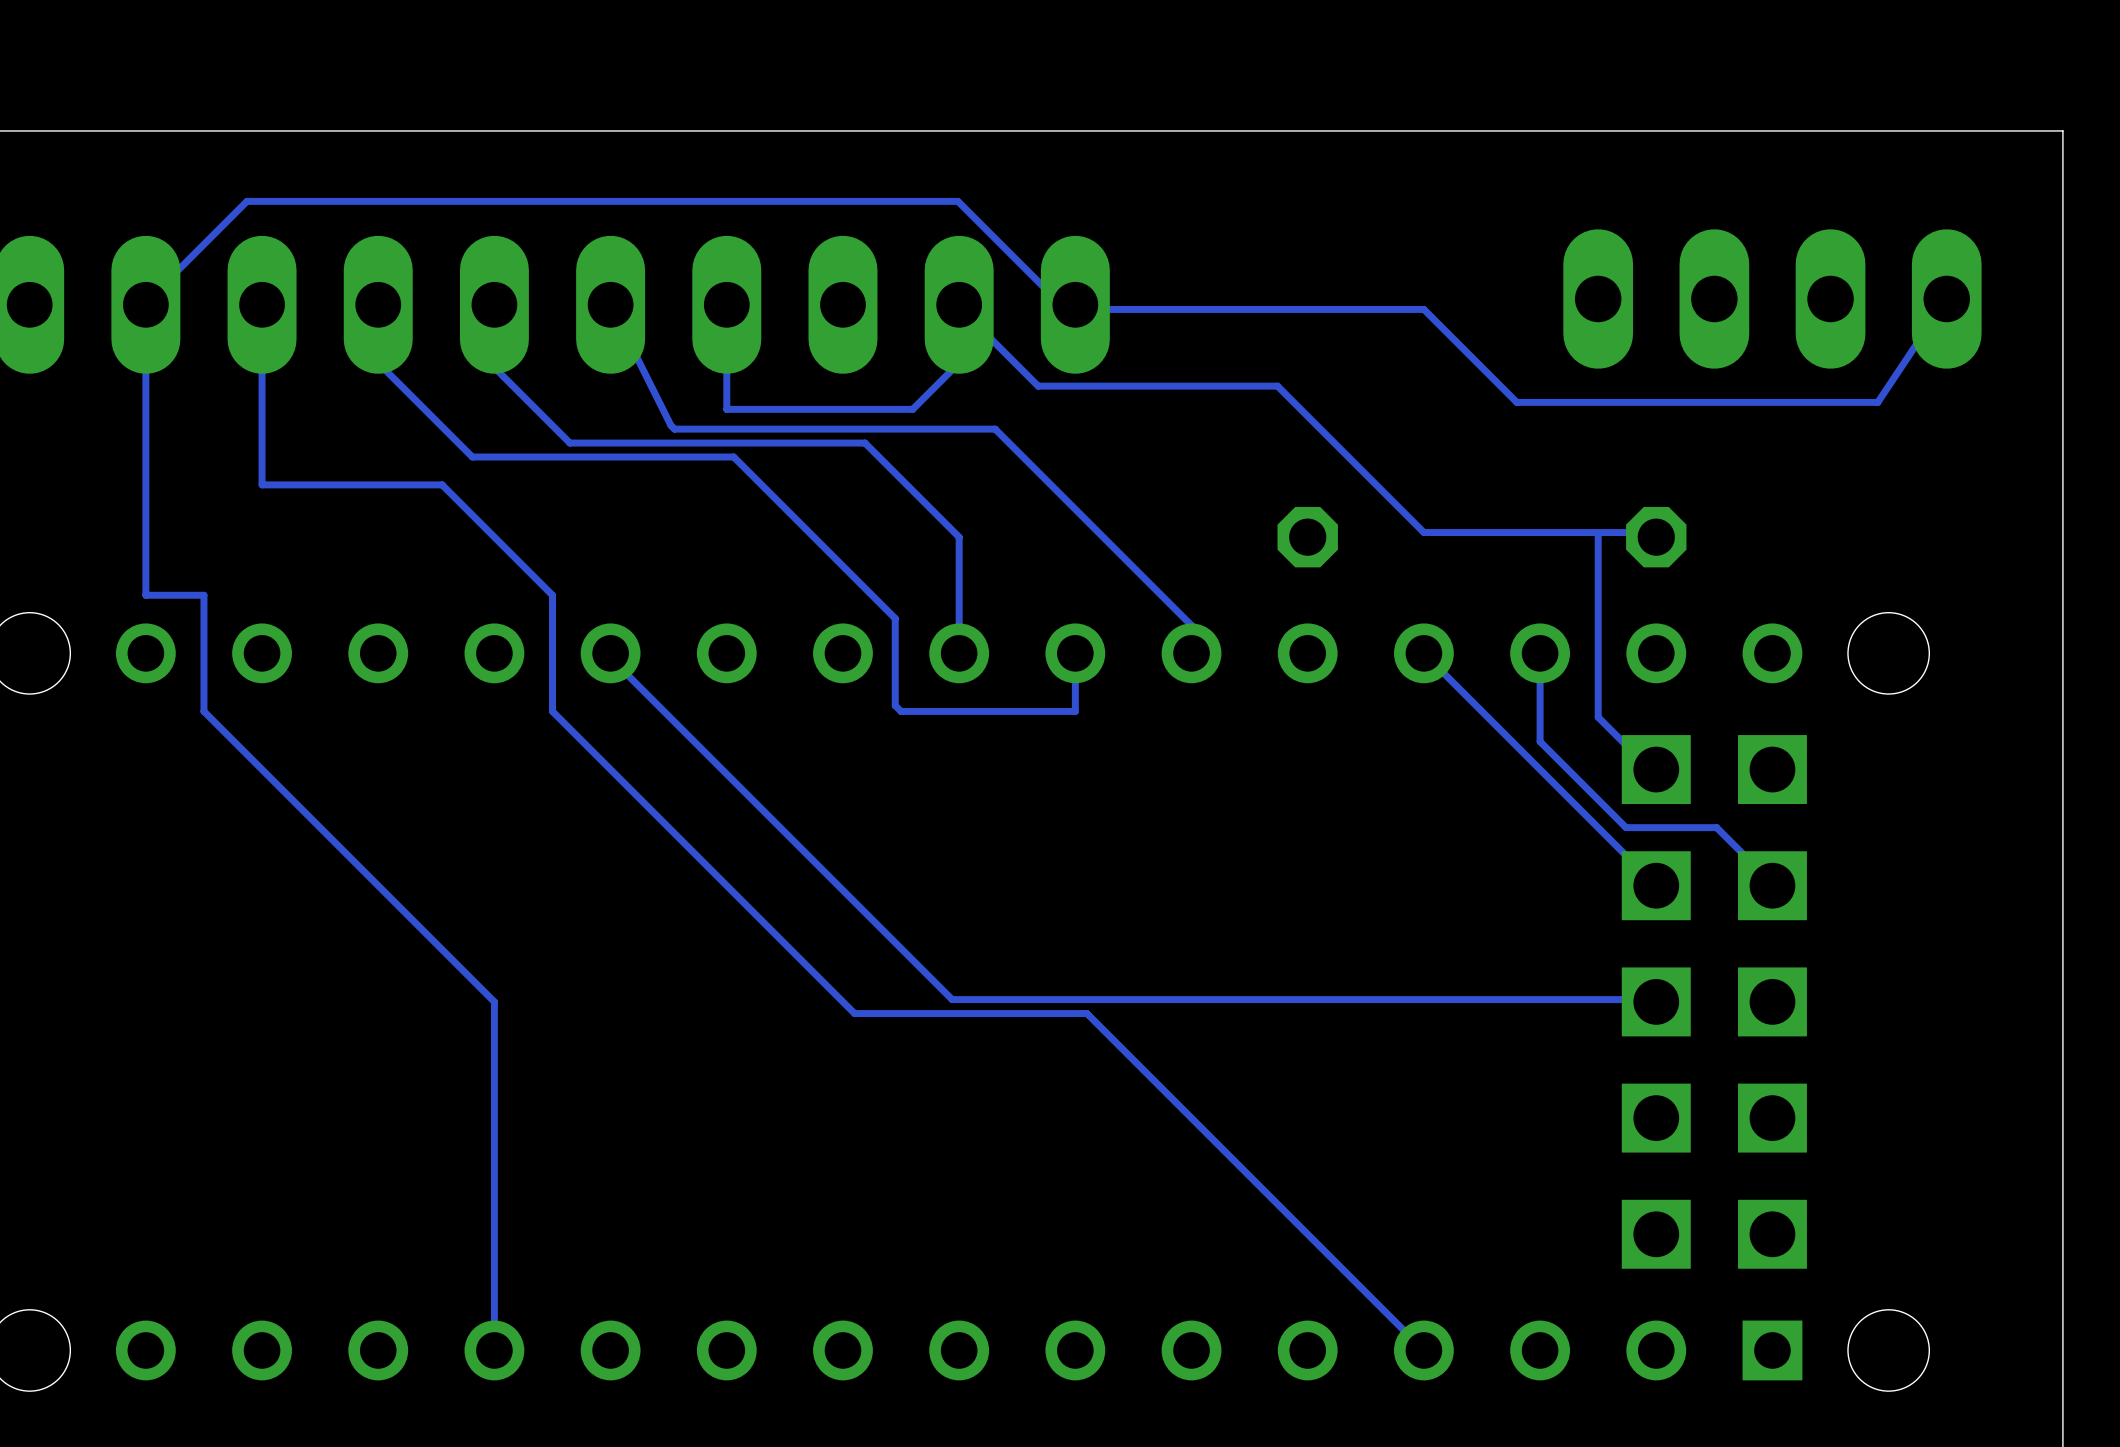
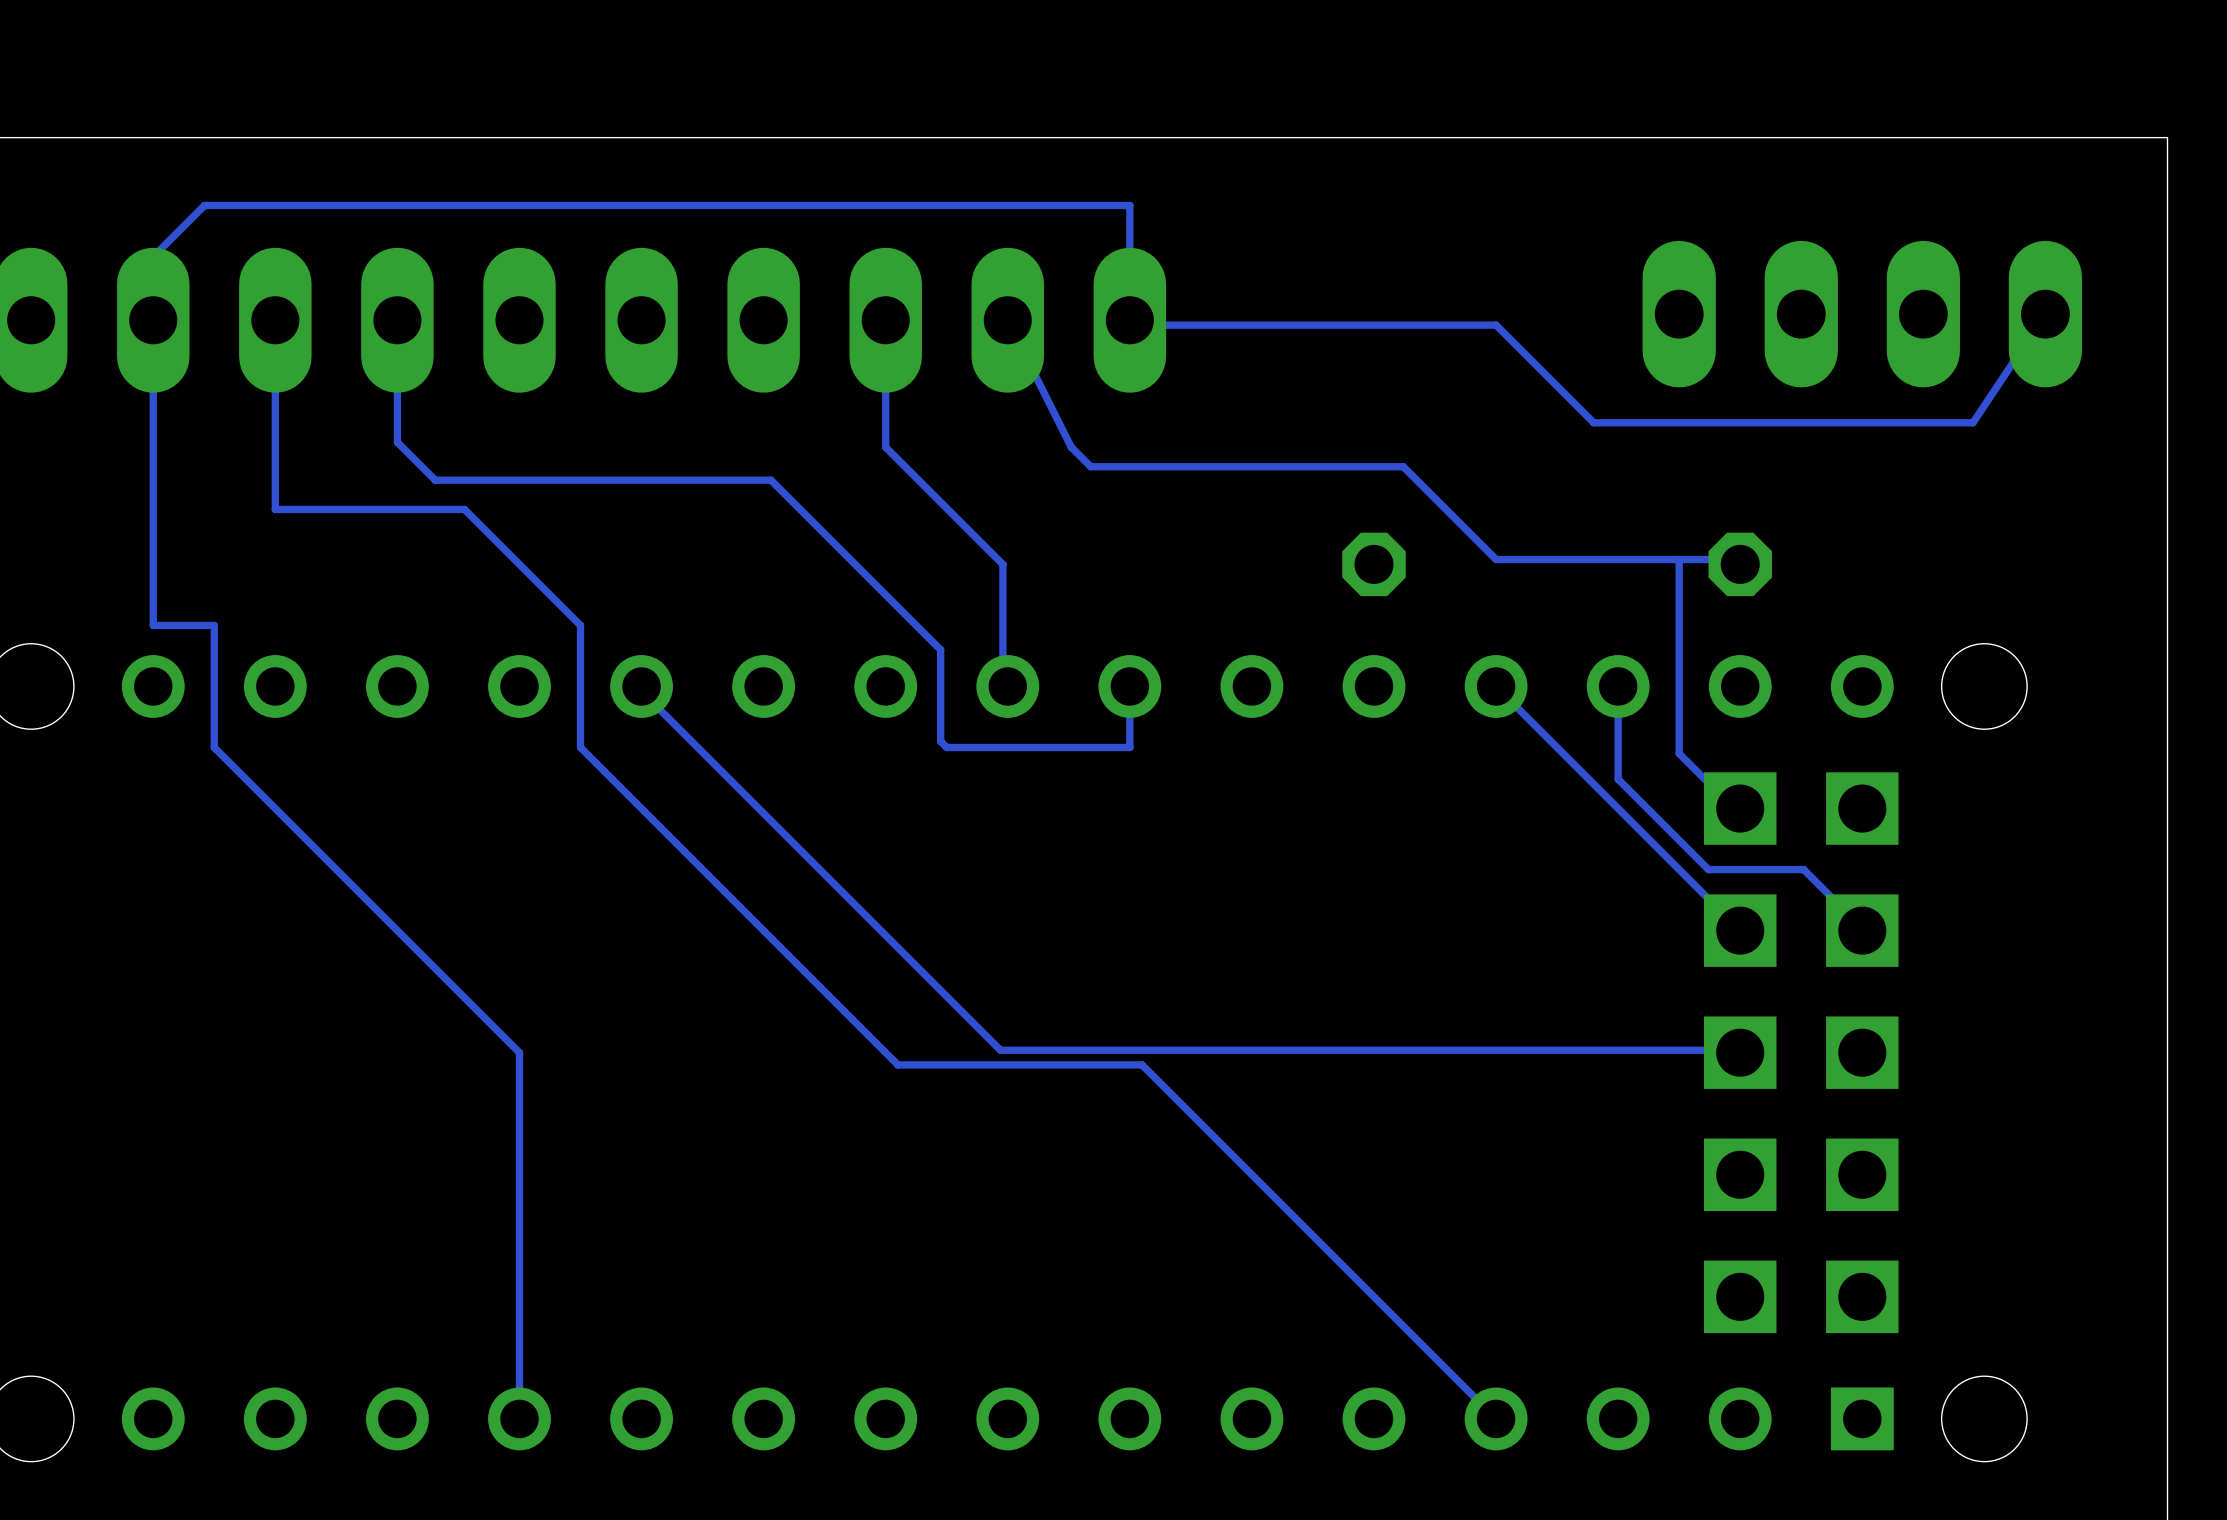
track: (145, 302) (246, 201) (958, 201) (1059, 302) (1073, 302) (1075, 304) -> (153, 317) (153, 256) (204, 205) (1129, 205) (1129, 320)
track: (494, 304) (494, 367) (569, 443) (865, 443) (959, 537) (959, 653) -> (885, 320) (885, 447) (1002, 564) (1002, 684) (1007, 686)
track: (610, 304) (671, 425) (674, 429) (995, 429) (1191, 625) (1191, 653) -> none
track: (959, 304) (959, 362) (912, 409) (726, 409) (726, 304) -> none
track: (961, 309) (1038, 386) (1277, 386) (1335, 444) -> (1010, 325) (1071, 447) (1090, 466) (1403, 466)
track: (378, 362) (472, 457) -> (397, 381) (397, 442) (435, 480) (496, 480)

